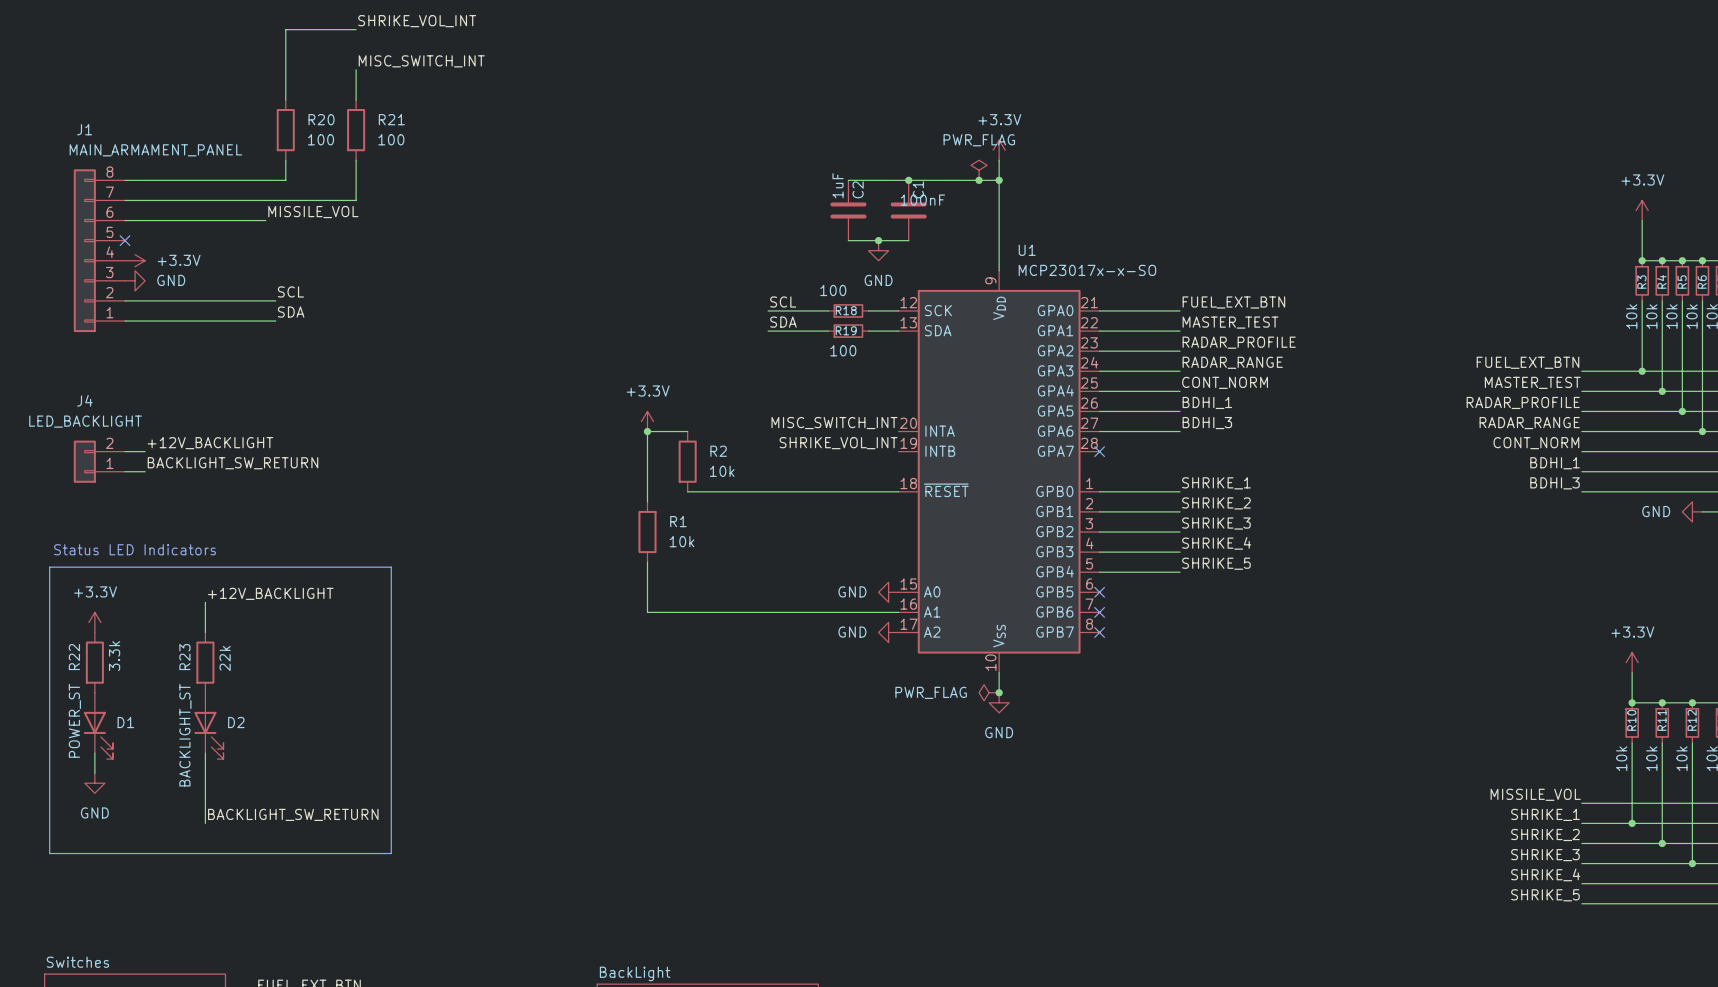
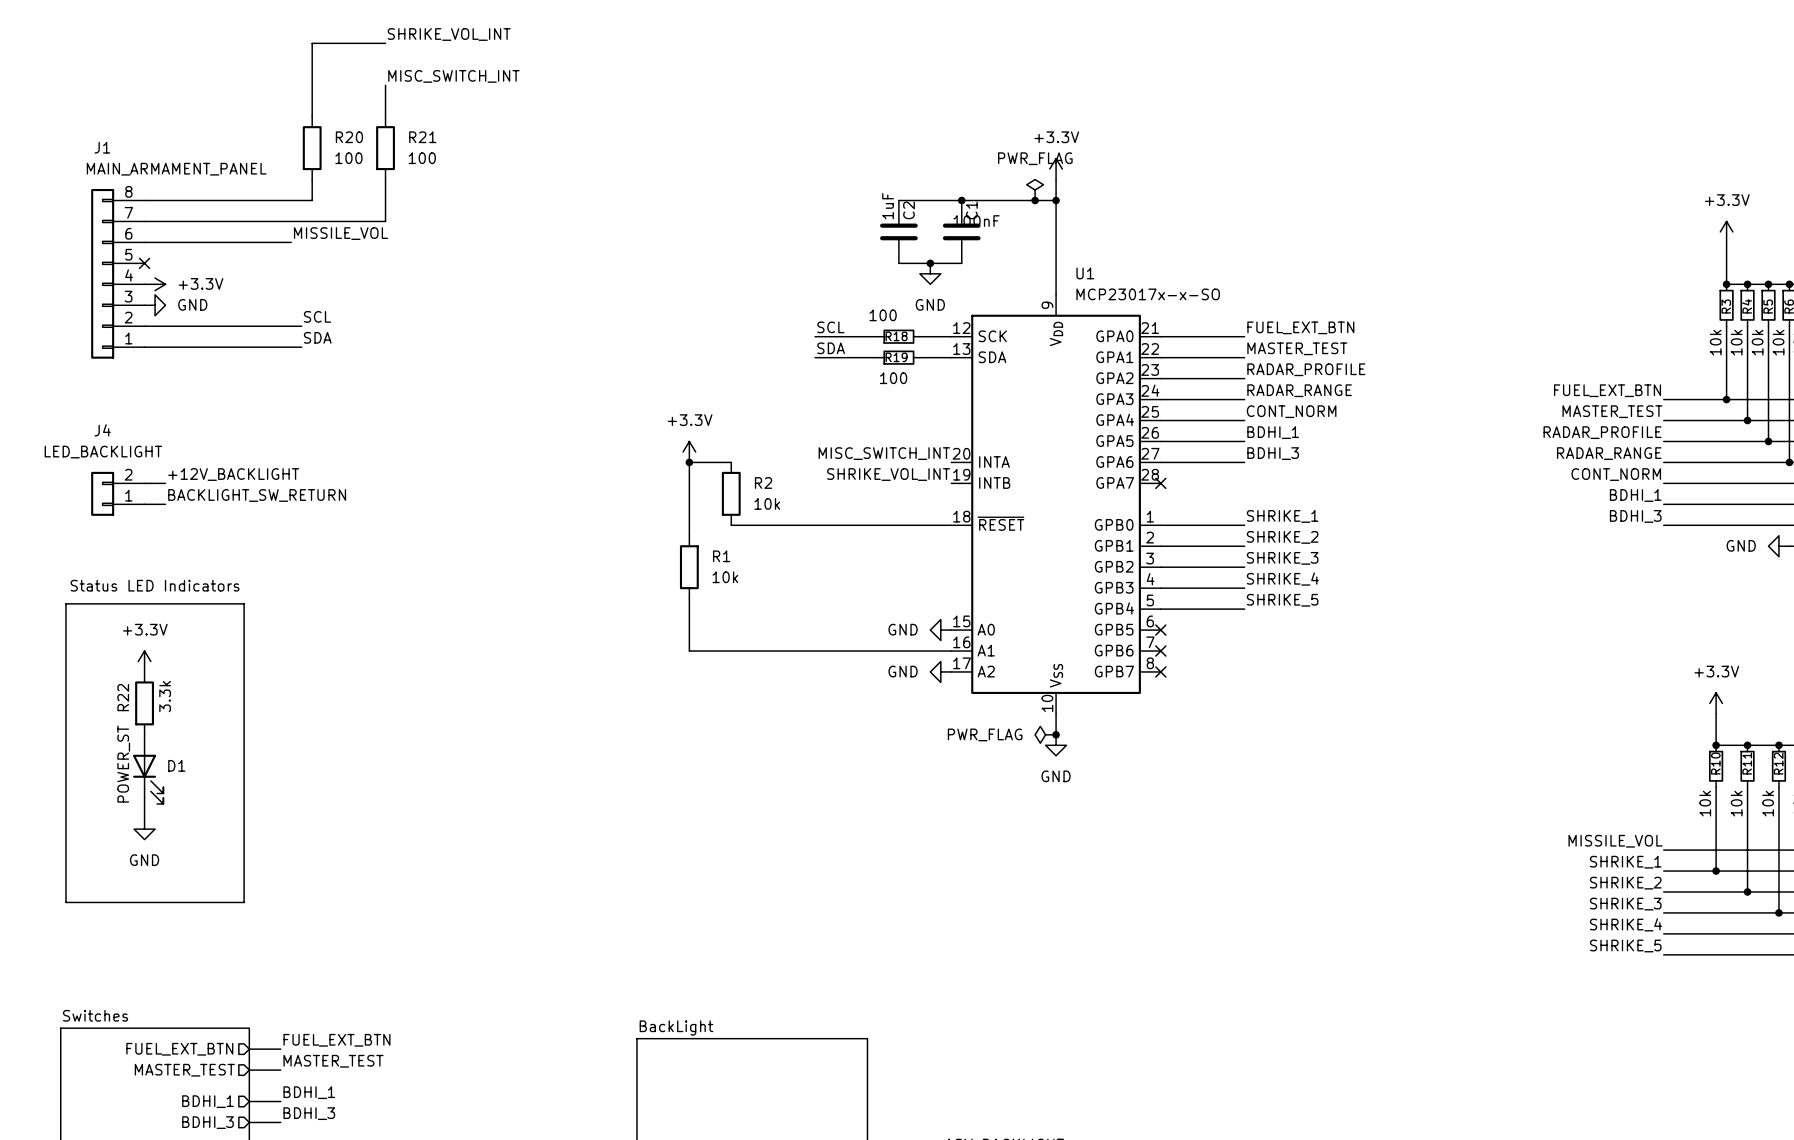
line: (220, 567) (391, 567) (391, 853) (220, 853) -> (244, 603) (244, 902)
label: +12V_BACKLIGHT (270, 593) -> none
wire: (205, 602) (205, 632) -> none
power symbol position: +3.3V (94, 622) -> +3.3V (144, 661)
R22 position: (94, 662) -> (144, 703)
R23: 22k (205, 662) -> none
D1 position: (98, 725) -> (148, 769)
D2: BACKLIGHT_ST (208, 725) -> none
wire: (94, 753) (94, 773) -> (144, 797) (144, 818)
wire: (205, 753) (205, 823) -> none
power symbol position: GND (94, 783) -> GND (144, 829)
label: BACKLIGHT_SW_RETURN (293, 814) -> none

